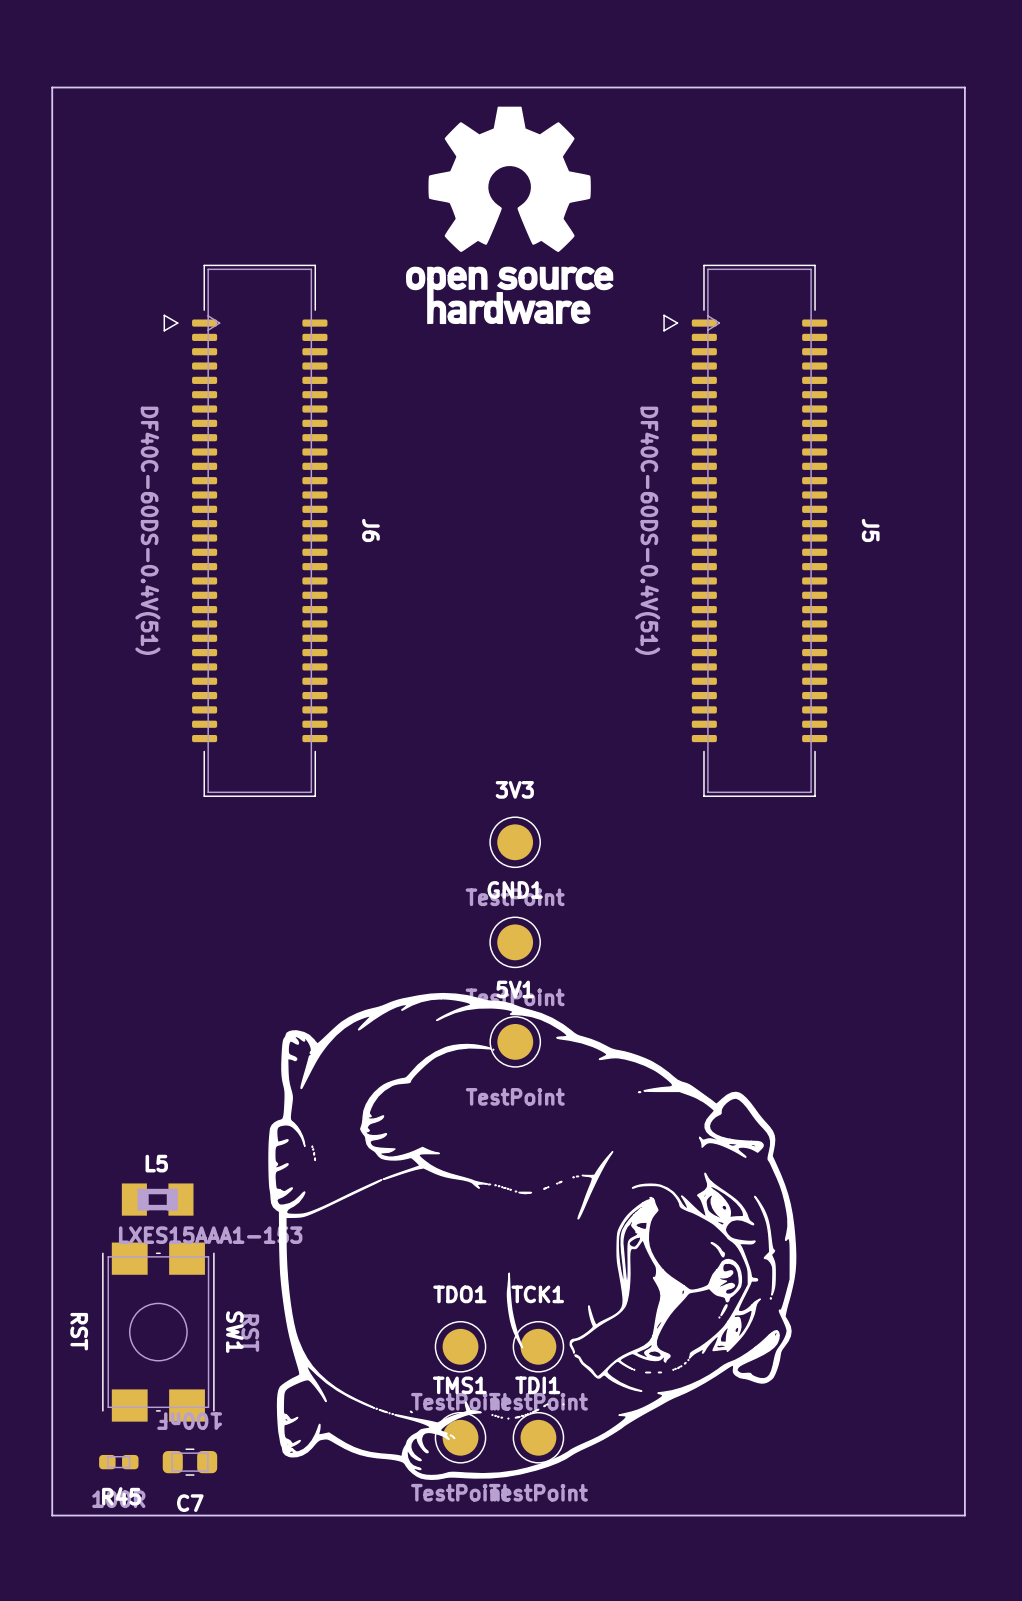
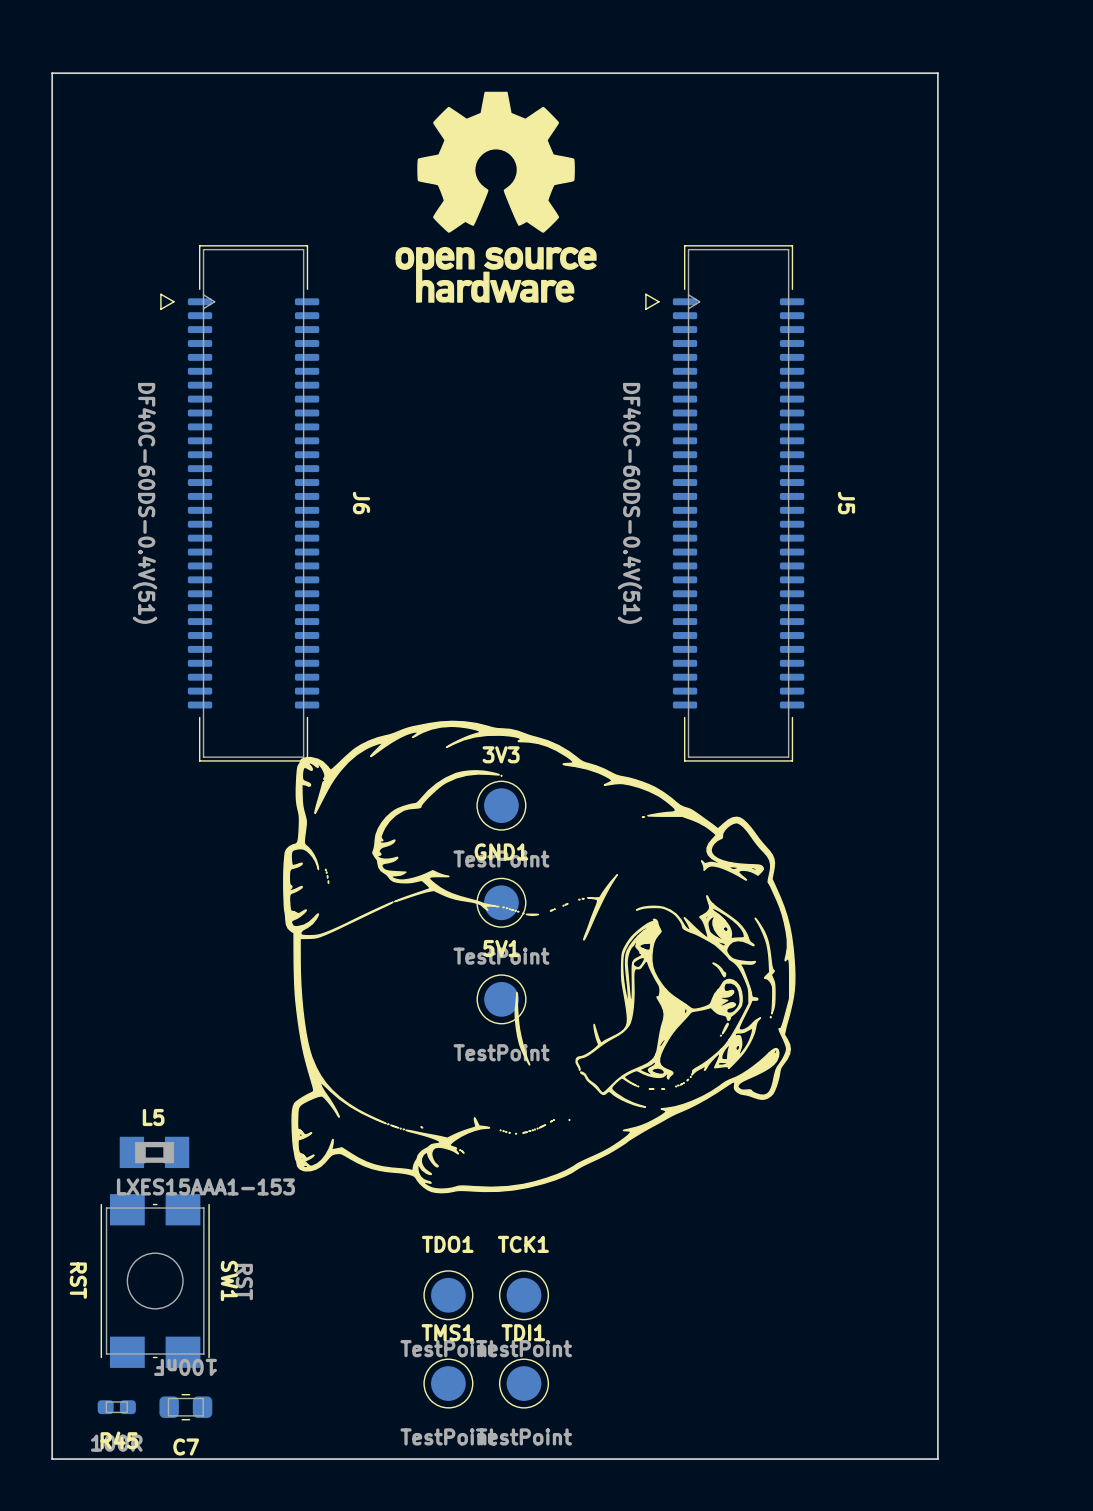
drawing position: (532, 1236) -> (539, 957)

